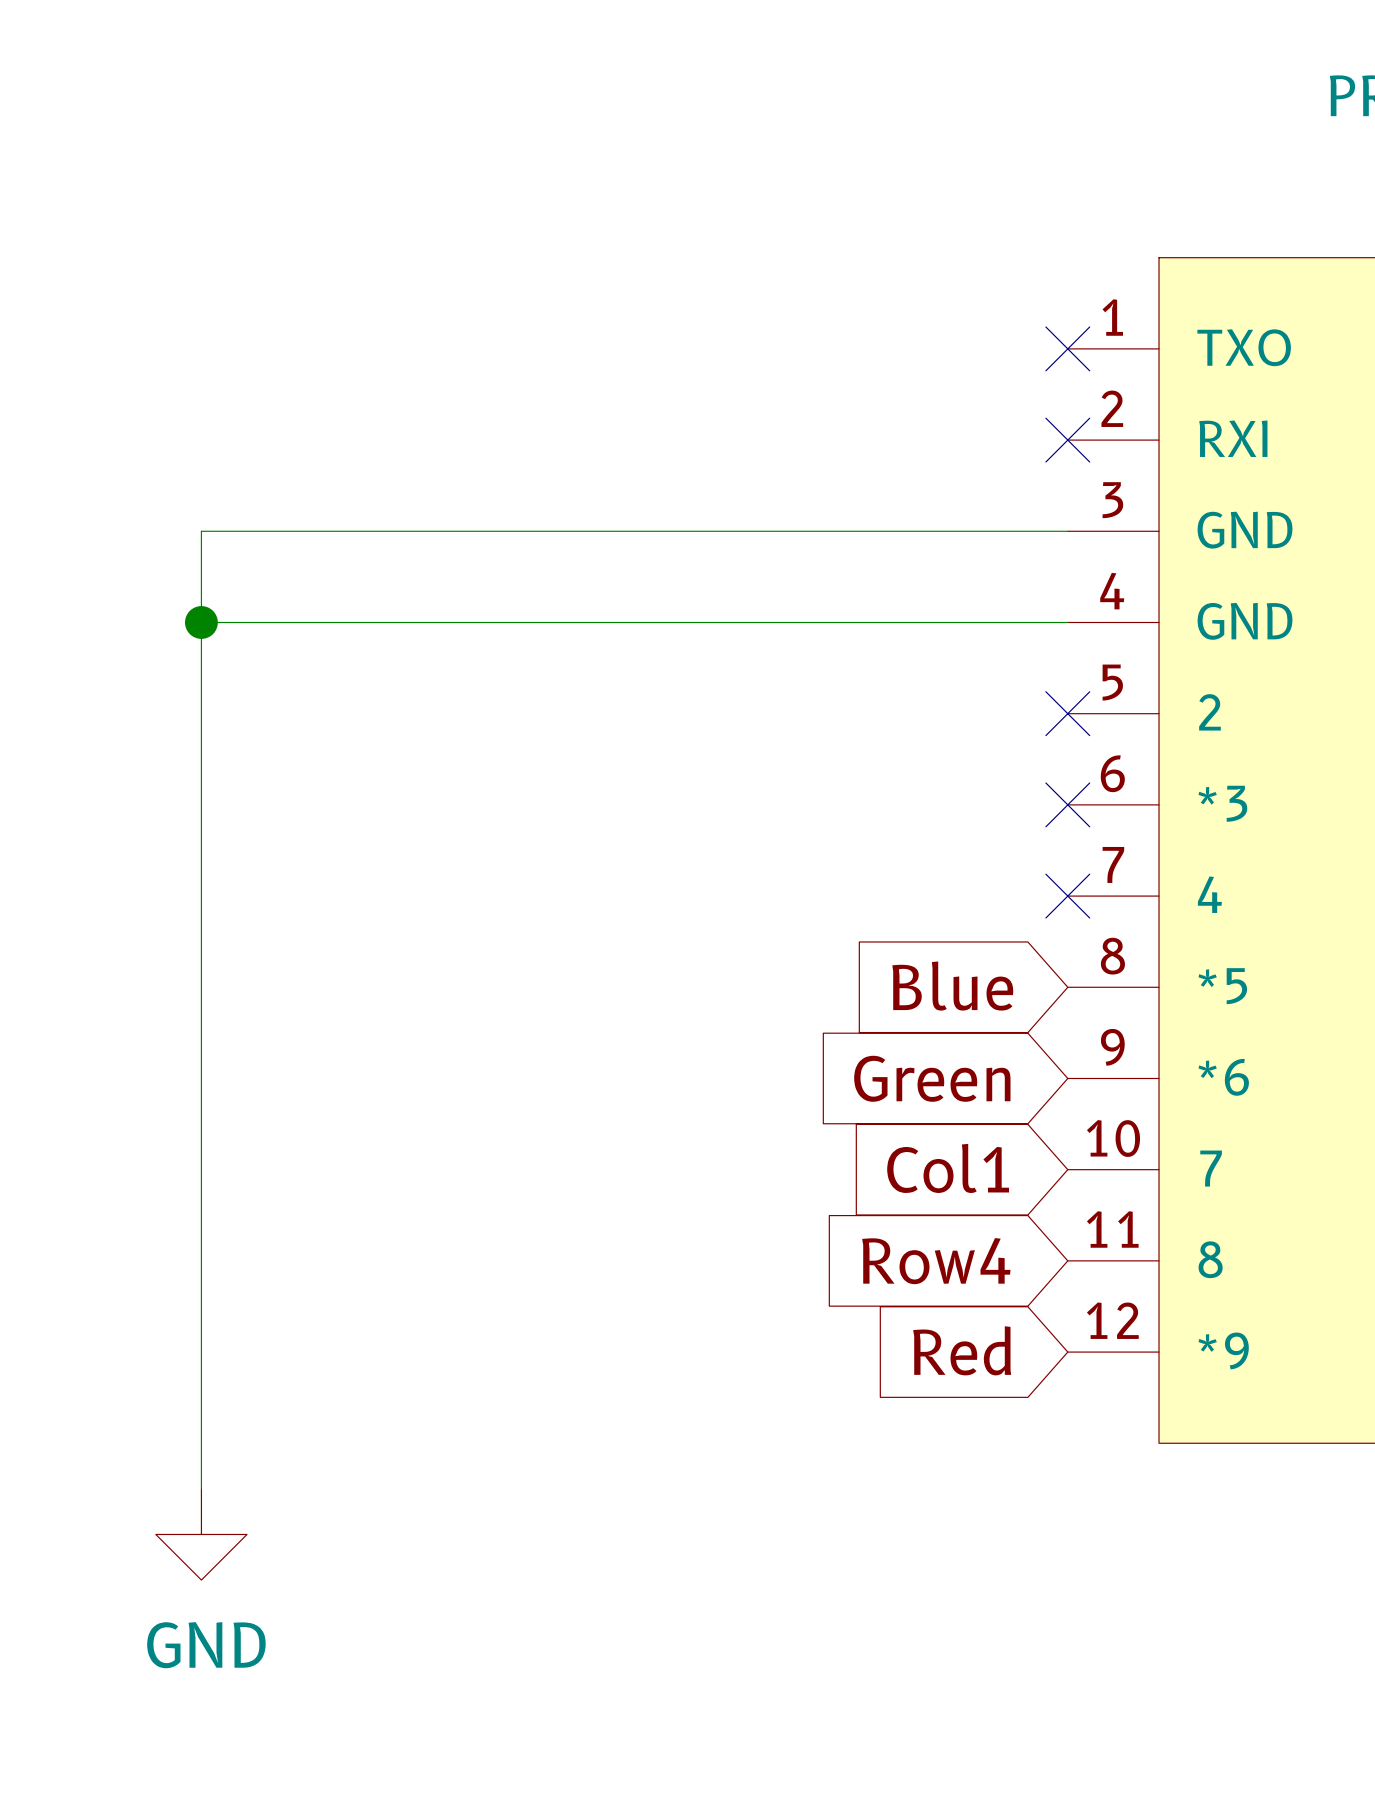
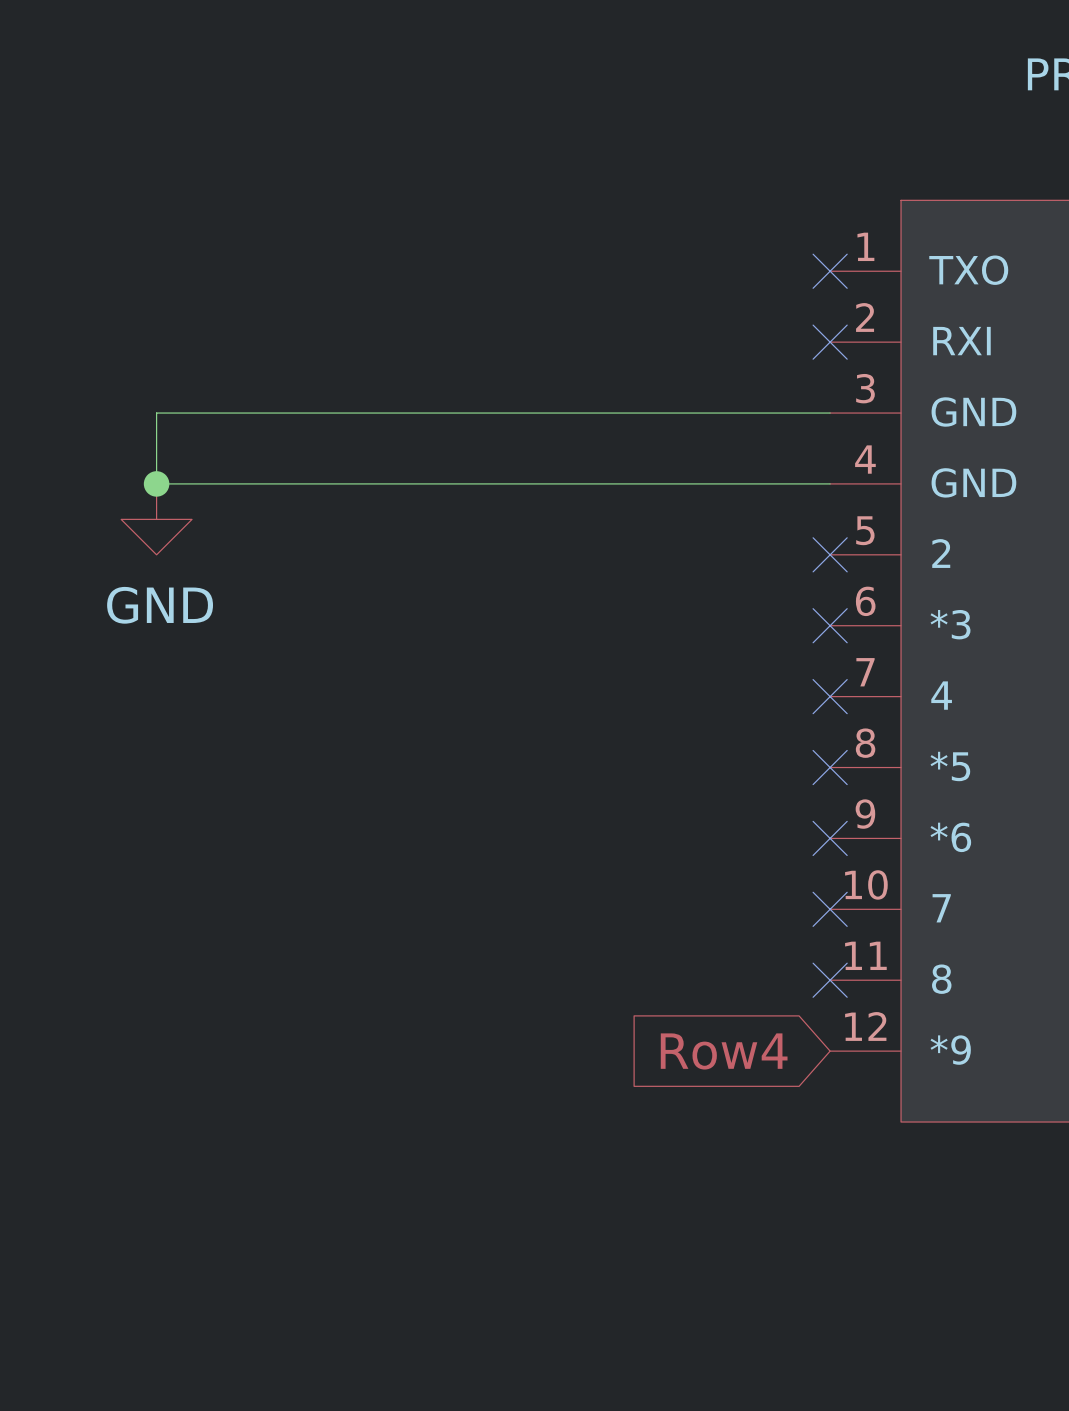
wire: (201, 622) (201, 1488) -> none
global label: Blue (952, 986) -> none
no-connect mark: none -> (830, 767)
global label: Green (932, 1078) -> none
no-connect mark: none -> (830, 838)
global label: Col1 (948, 1168) -> none
no-connect mark: none -> (830, 909)
no-connect mark: none -> (830, 980)
global label: Row4 (936, 1261) -> none
global label: Red (962, 1350) -> Row4 (724, 1051)
power symbol position: GND (201, 1534) -> GND (156, 519)

